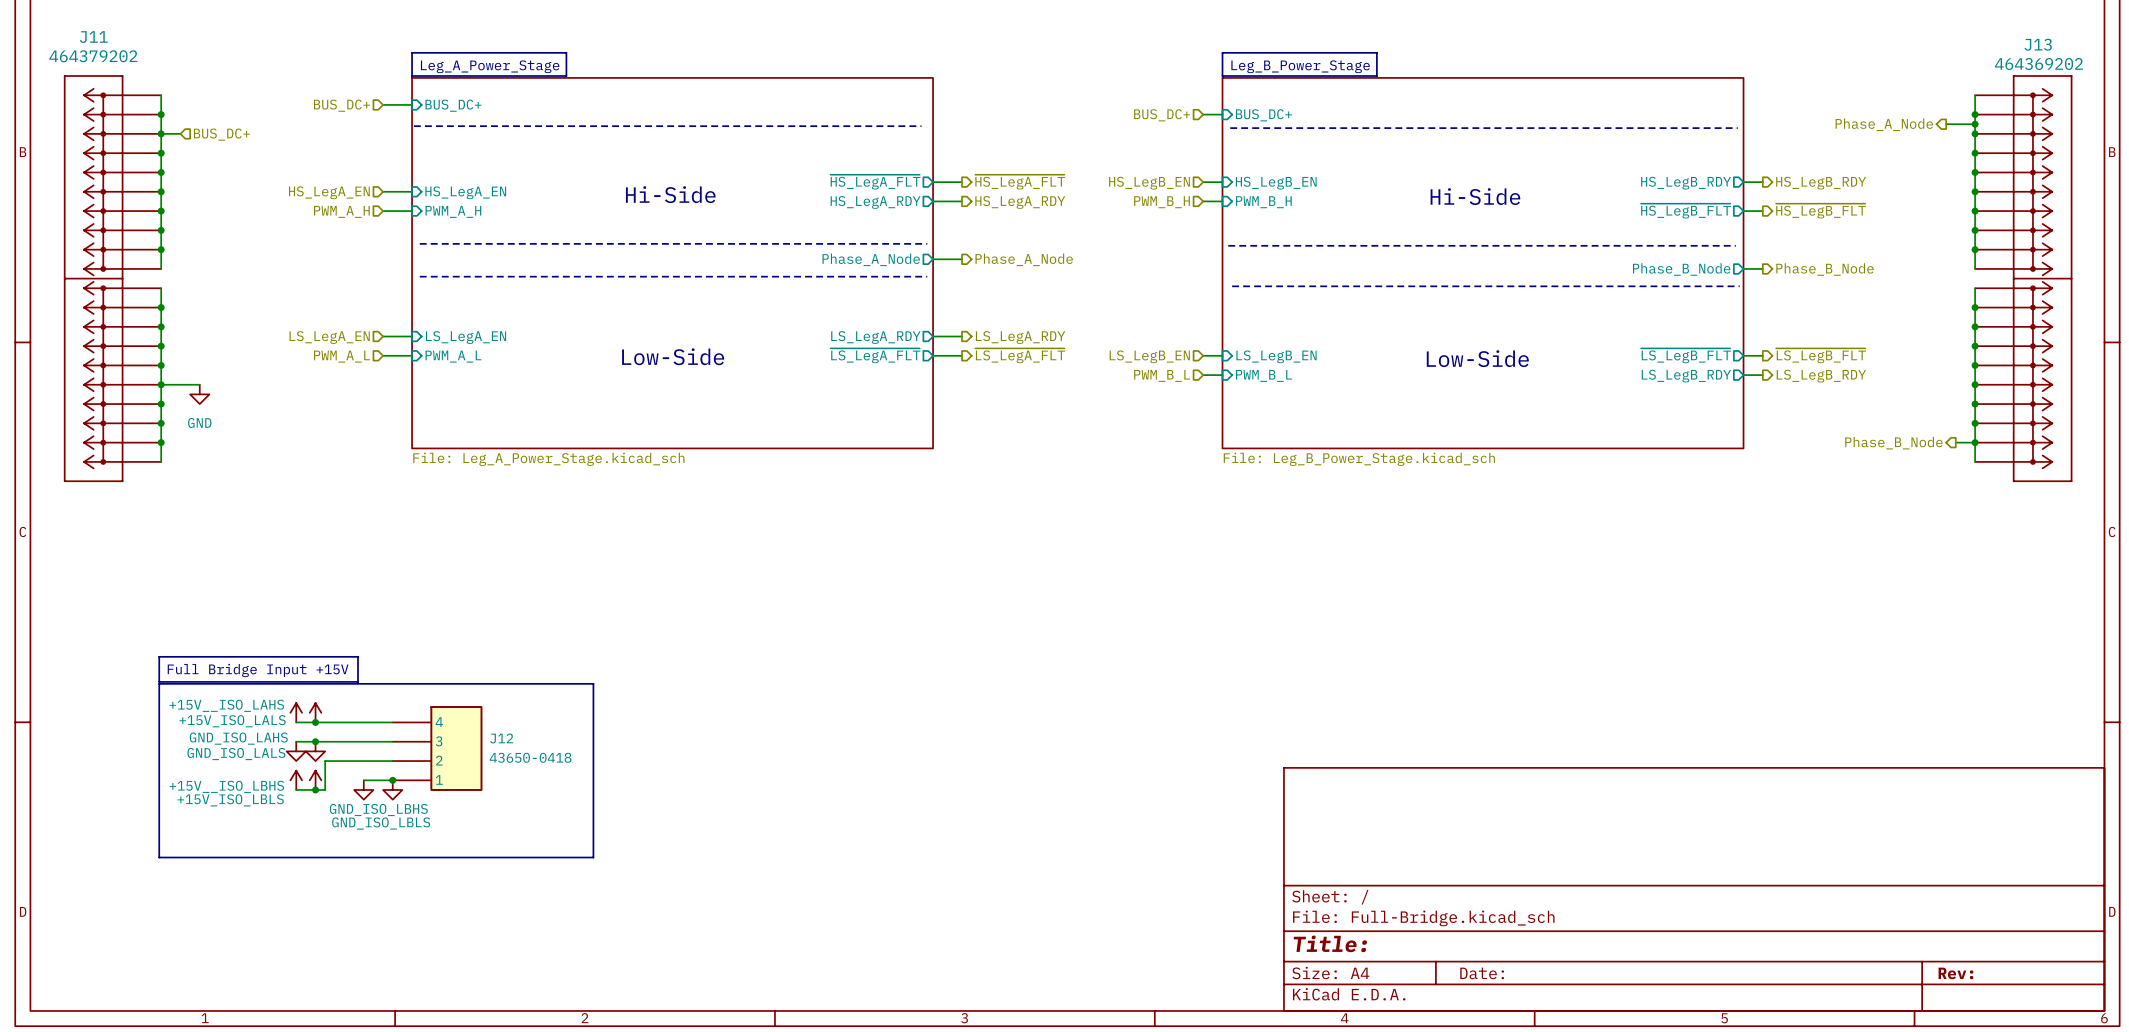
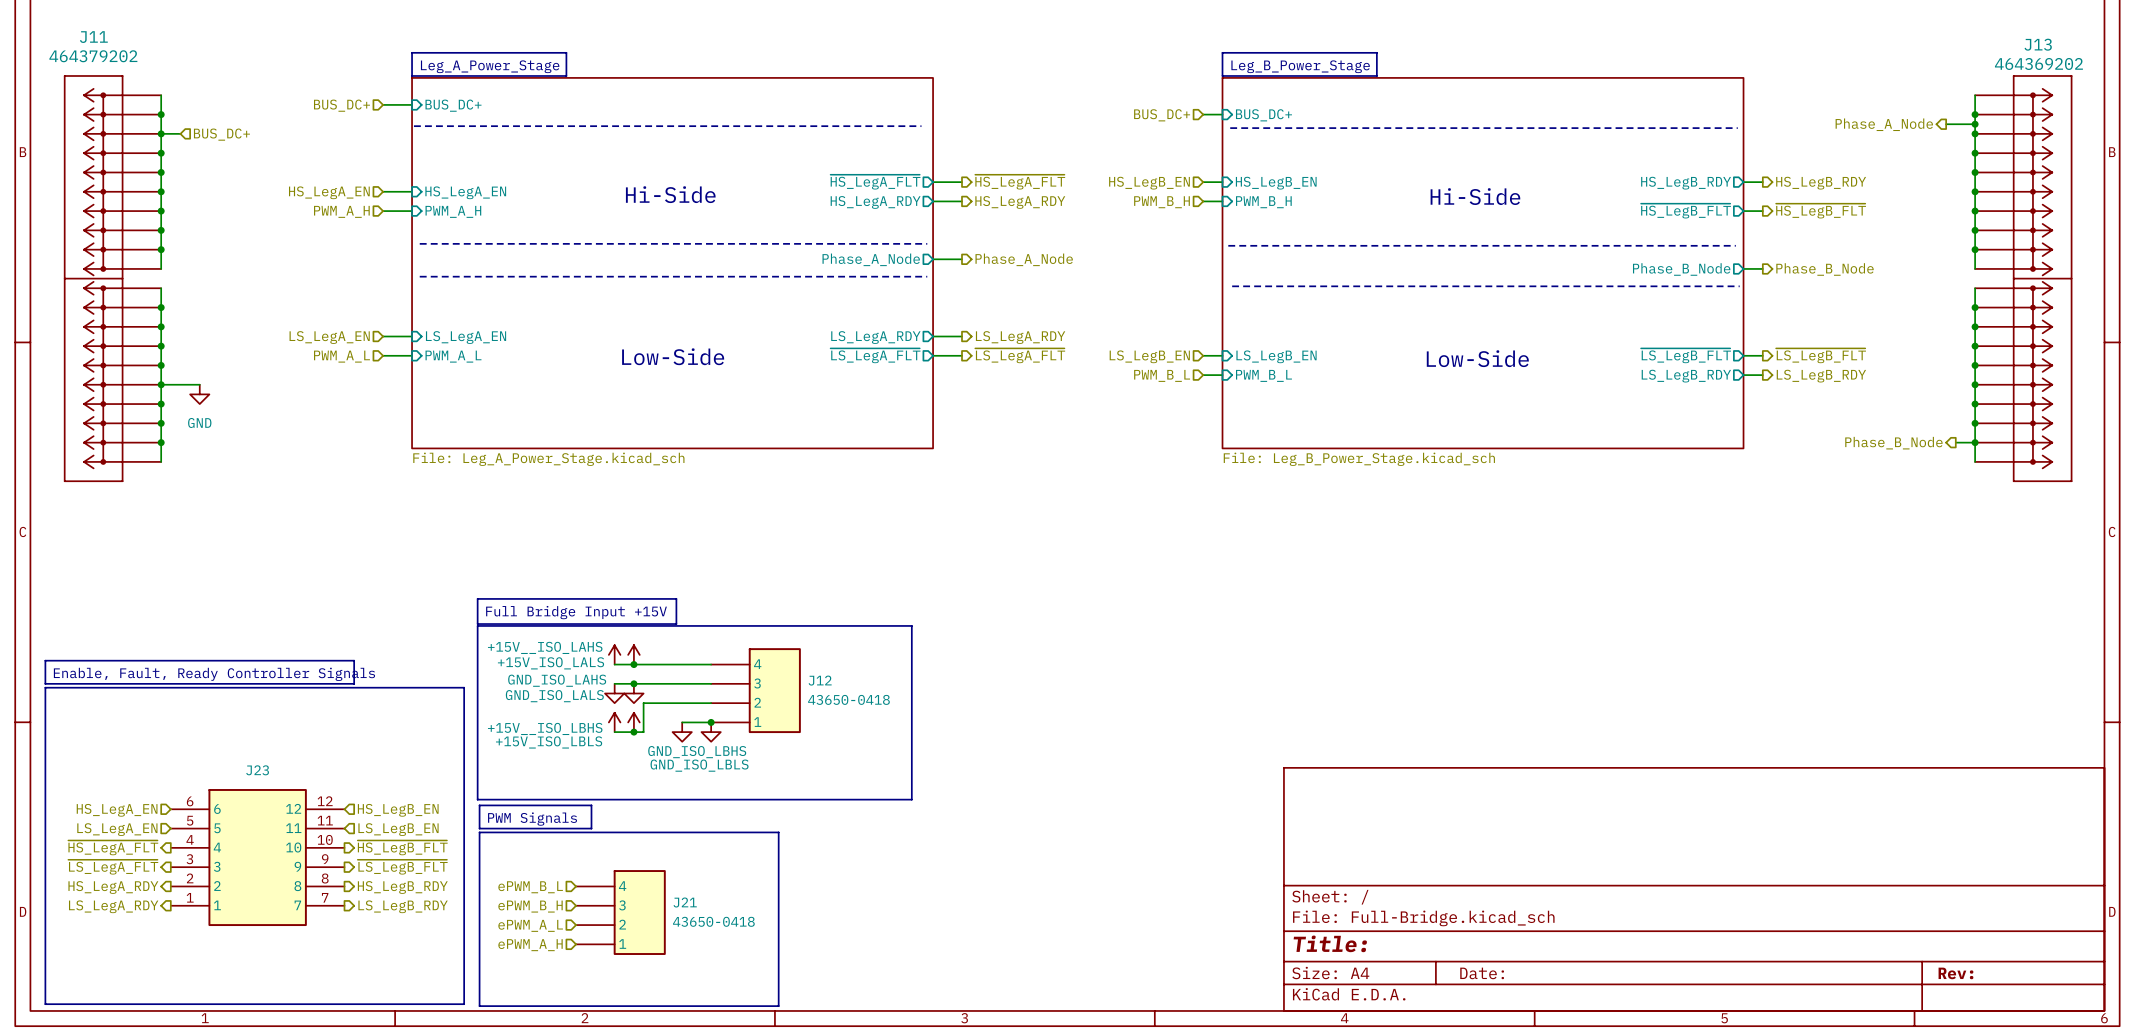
line: none -> (477, 598) (477, 624) (676, 624) (676, 598) (477, 598)
text: none -> Full Bridge Input +15V (576, 612)
line: none -> (477, 625) (911, 625) (911, 799) (477, 799) (477, 625)
power symbol: none -> +15V__ISO_LAHS (614, 654)
power symbol: none -> +15V_ISO_LALS (633, 654)
line: (159, 656) (159, 681) (358, 681) (358, 656) (159, 656) -> none
wire: none -> (614, 664) (711, 664)
junction: none -> (633, 664)
text: Full Bridge Input +15V (258, 670) -> none
text: none -> Enable, Fault, Ready Controller Signals (214, 674)
line: (159, 683) (159, 857) (593, 857) (593, 683) (354, 683) -> (159, 683) (45, 683) (45, 660) (354, 660) (354, 683)
wire: none -> (614, 683) (711, 683)
junction: none -> (633, 683)
line: none -> (45, 687) (464, 687) (464, 1004) (45, 1004) (45, 687)
power symbol: none -> GND_ISO_LAHS (614, 693)
power symbol: none -> GND_ISO_LALS (633, 693)
wire: none -> (711, 703) (643, 703) (643, 732) (614, 732)
power symbol: +15V__ISO_LAHS (296, 712) -> none
power symbol: +15V_ISO_LALS (315, 712) -> none
wire: (296, 722) (392, 722) -> none
junction: (315, 722) -> none
power symbol: none -> +15V__ISO_LBHS (614, 722)
power symbol: none -> +15V_ISO_LBLS (633, 722)
wire: none -> (682, 722) (711, 722)
junction: none -> (711, 722)
junction: none -> (633, 732)
power symbol: none -> GND_ISO_LBLS (682, 732)
power symbol: none -> GND_ISO_LBHS (711, 732)
wire: (296, 741) (392, 741) -> none
junction: (315, 741) -> none
J12 position: (437, 748) -> (756, 690)
power symbol: GND_ISO_LAHS (296, 751) -> none
power symbol: GND_ISO_LALS (315, 751) -> none
wire: (392, 761) (325, 761) (325, 789) (296, 789) -> none
power symbol: +15V__ISO_LBHS (296, 780) -> none
power symbol: +15V_ISO_LBLS (315, 780) -> none
wire: (363, 780) (392, 780) -> none
junction: (392, 780) -> none
junction: (315, 789) -> none
power symbol: GND_ISO_LBLS (363, 789) -> none
power symbol: GND_ISO_LBHS (392, 789) -> none
line: none -> (479, 805) (479, 828) (591, 828) (591, 805) (479, 805)
hierarchical label: none -> HS_LegA_EN (117, 810)
hierarchical label: none -> HS_LegB_EN (398, 810)
text: none -> PWM Signals (532, 819)
hierarchical label: none -> LS_LegA_EN (117, 829)
hierarchical label: none -> LS_LegB_EN (398, 829)
line: none -> (479, 832) (778, 832) (778, 1006) (479, 1006) (479, 832)
hierarchical label: none -> ~{HS_LegA_FLT} (113, 847)
hierarchical label: none -> ~{HS_LegB_FLT} (402, 847)
J23: none -> (257, 857)
hierarchical label: none -> ~{LS_LegA_FLT} (113, 867)
hierarchical label: none -> ~{LS_LegB_FLT} (402, 867)
hierarchical label: none -> HS_LegA_RDY (113, 887)
hierarchical label: none -> HS_LegB_RDY (402, 887)
hierarchical label: none -> ePWM_B_L (530, 887)
hierarchical label: none -> LS_LegA_RDY (113, 906)
hierarchical label: none -> LS_LegB_RDY (403, 906)
hierarchical label: none -> ePWM_B_H (530, 906)
J21: none -> 43650-0418 (620, 912)
hierarchical label: none -> ePWM_A_L (530, 925)
hierarchical label: none -> ePWM_A_H (530, 945)

